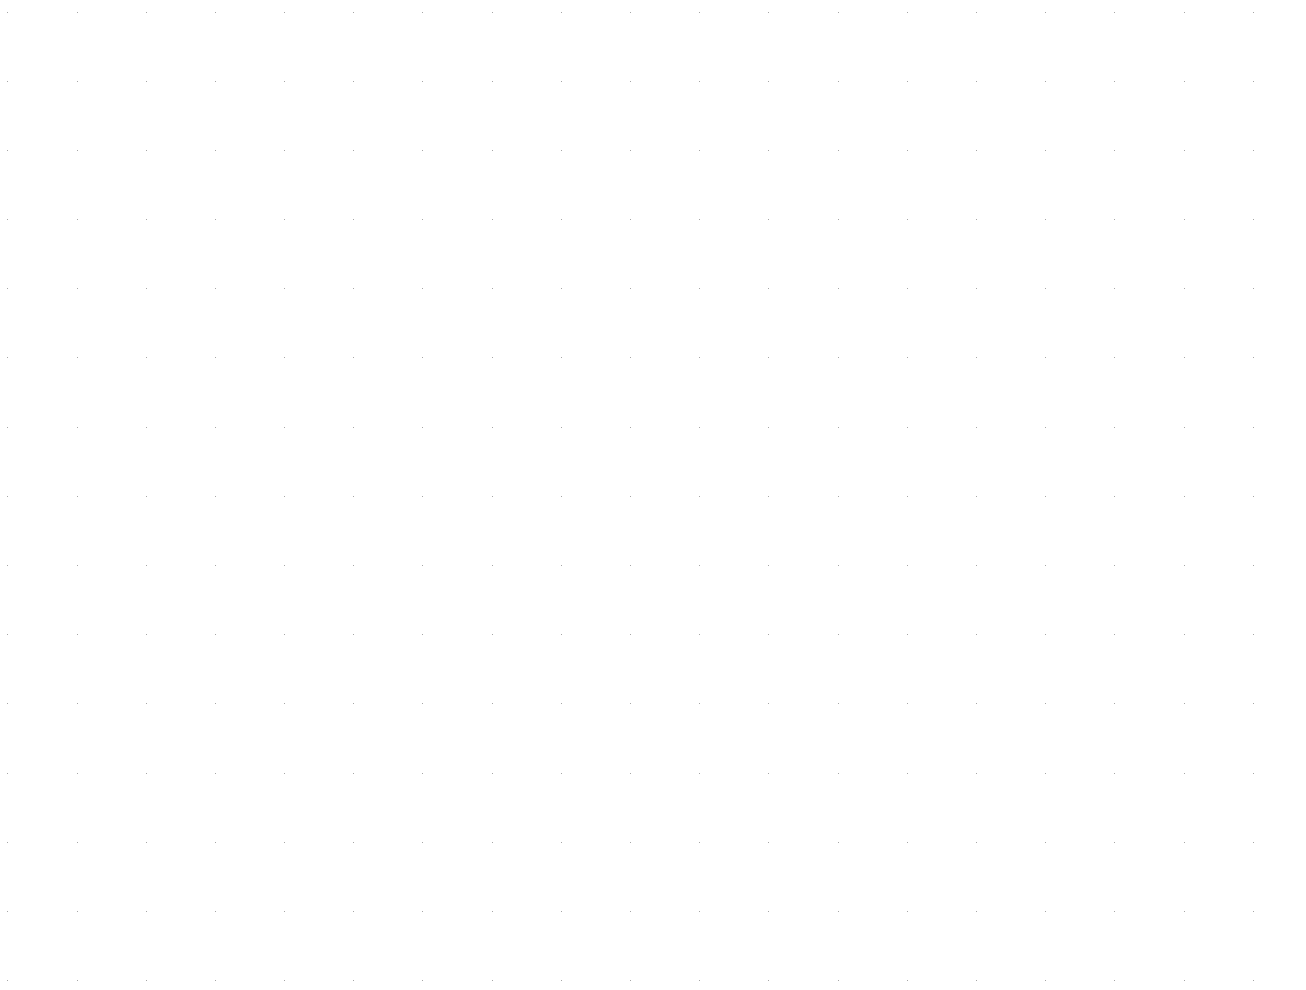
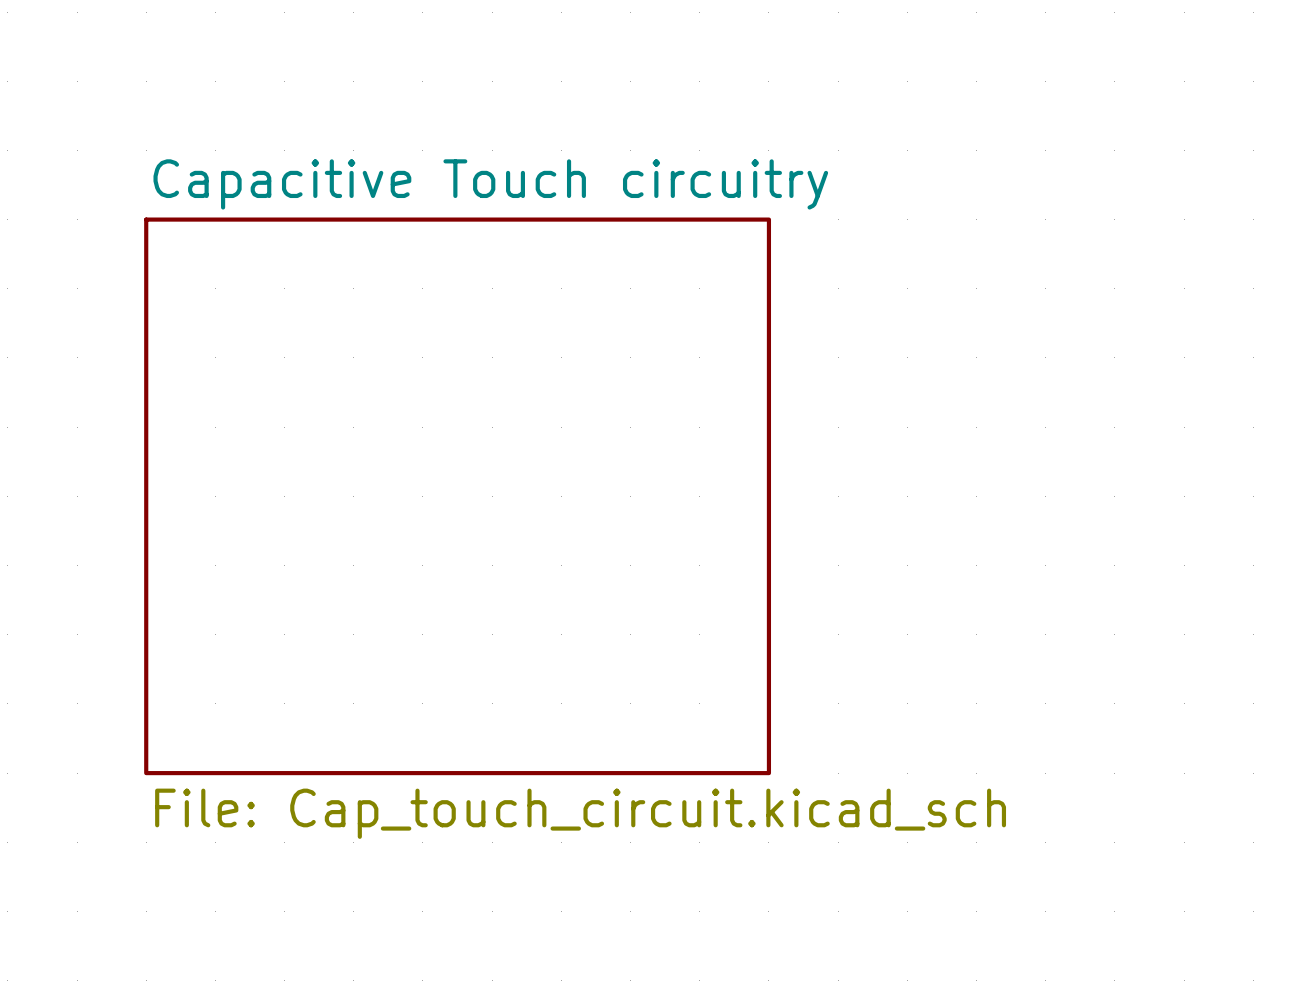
sheet Capacitive Touch circuitry: none -> File: Cap_touch_circuit.kicad_sch (457, 496)

